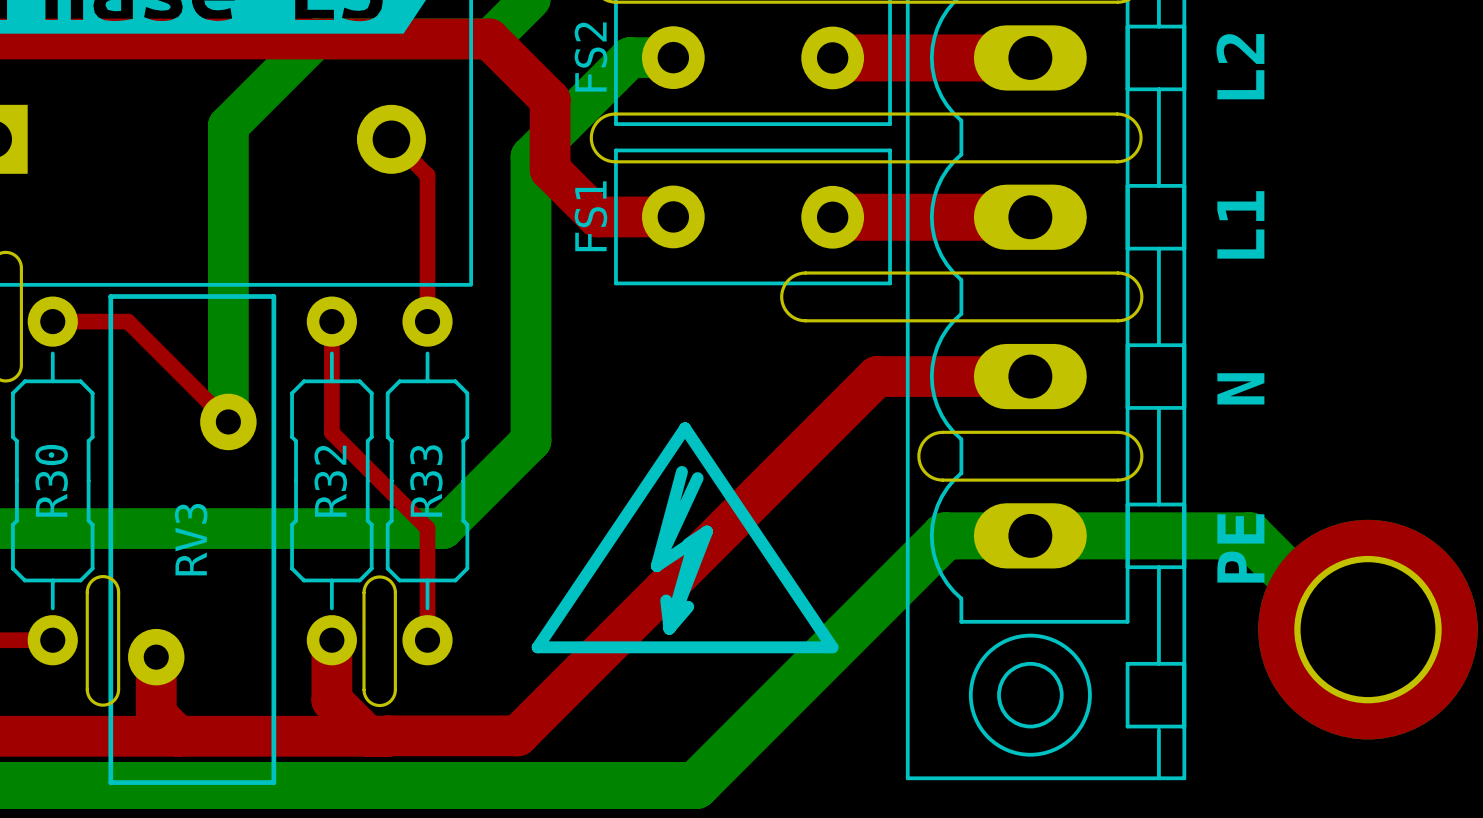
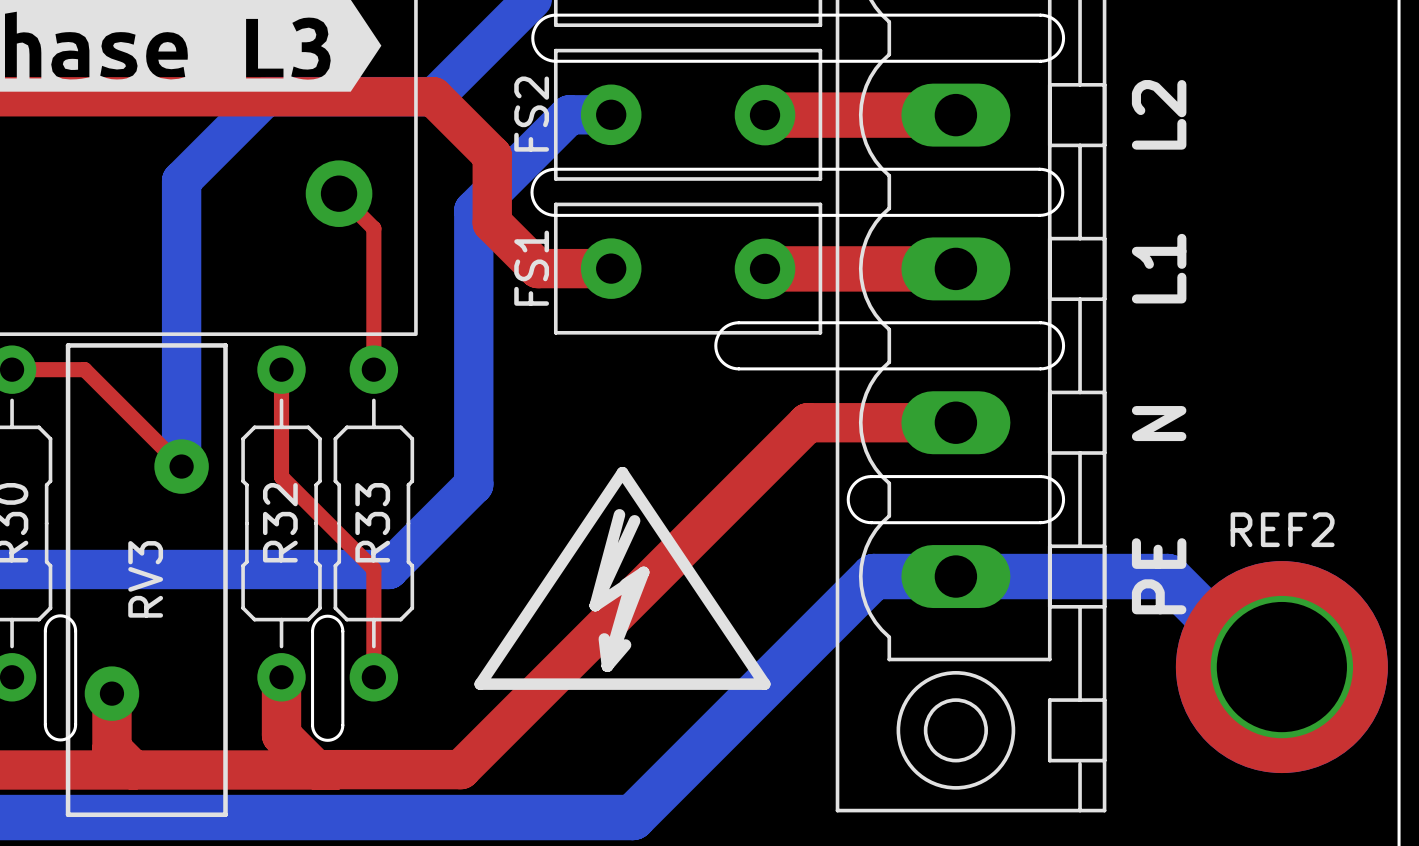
REF2 name: none -> REF2 (1282, 529)

